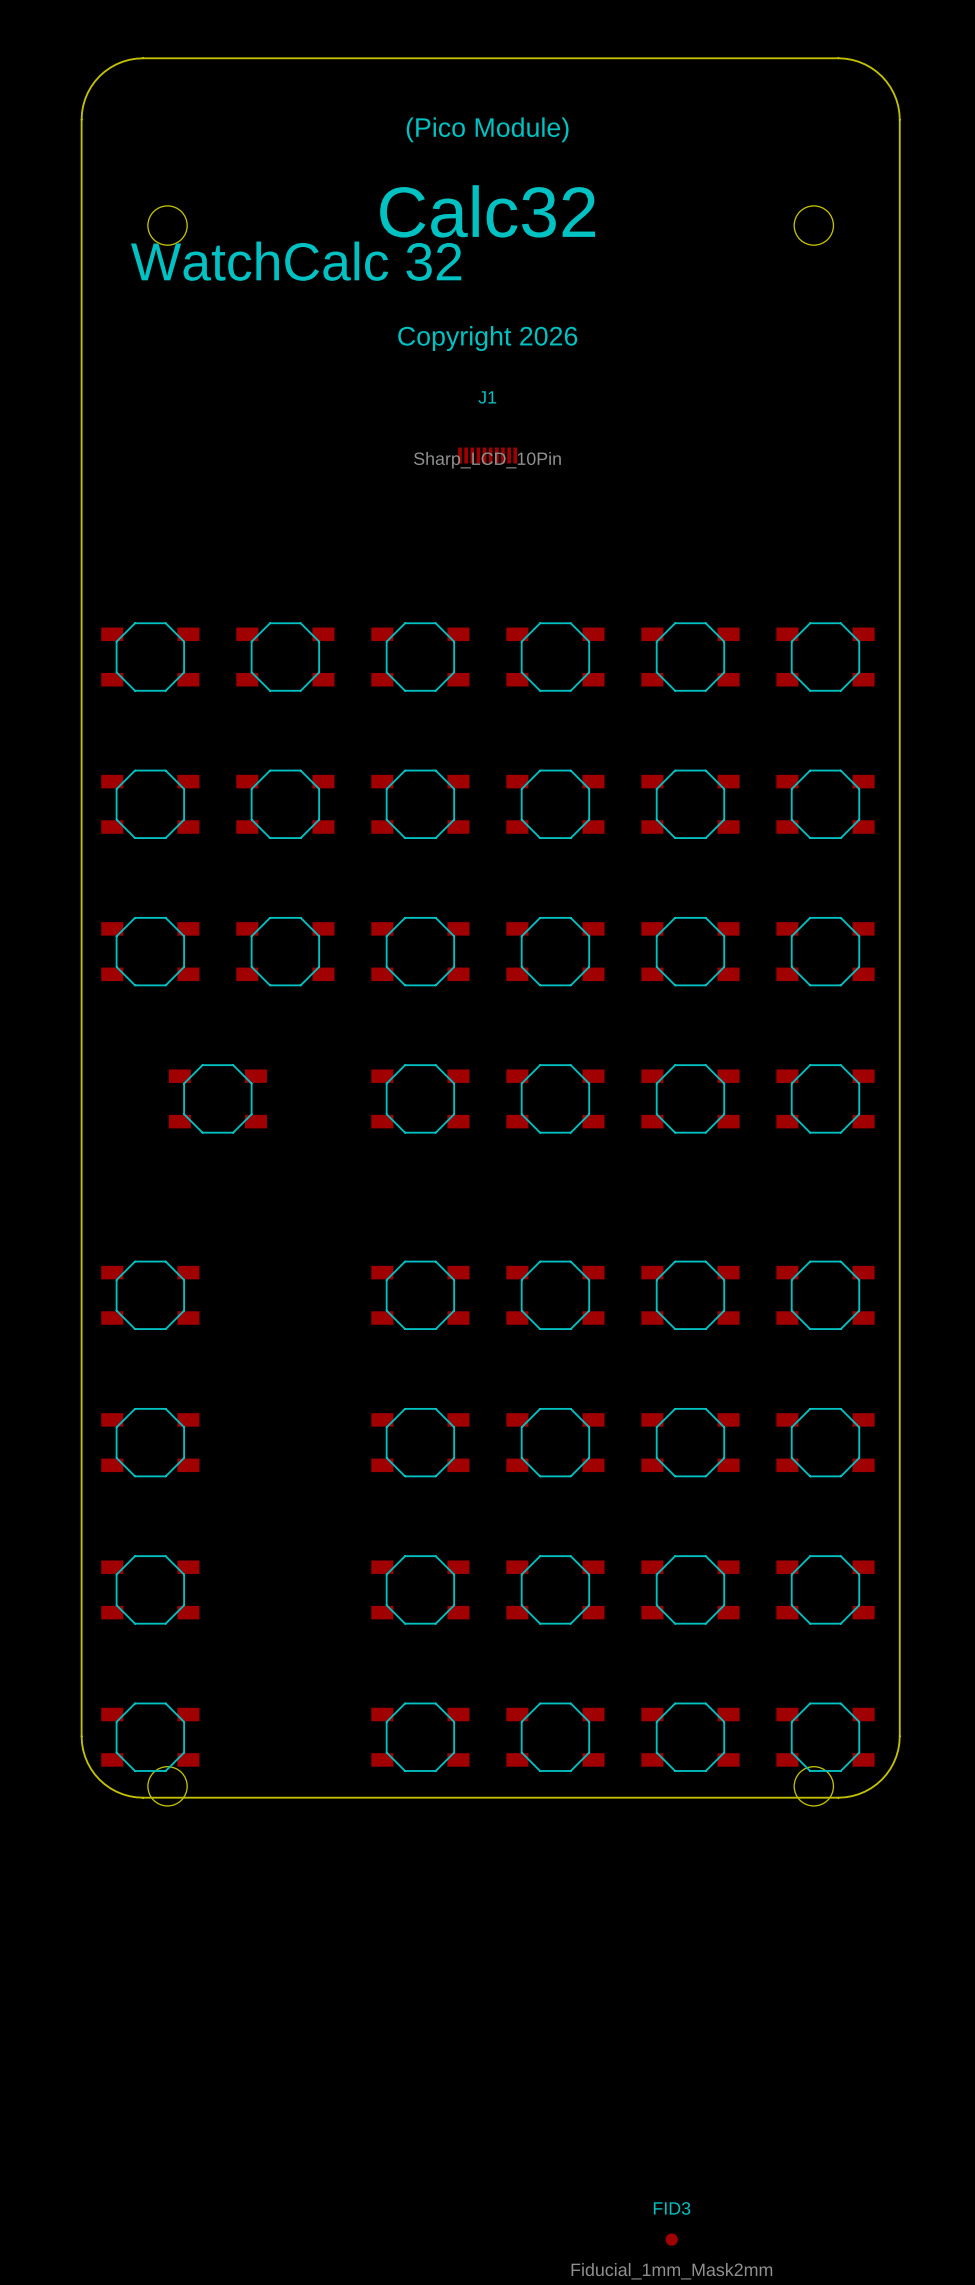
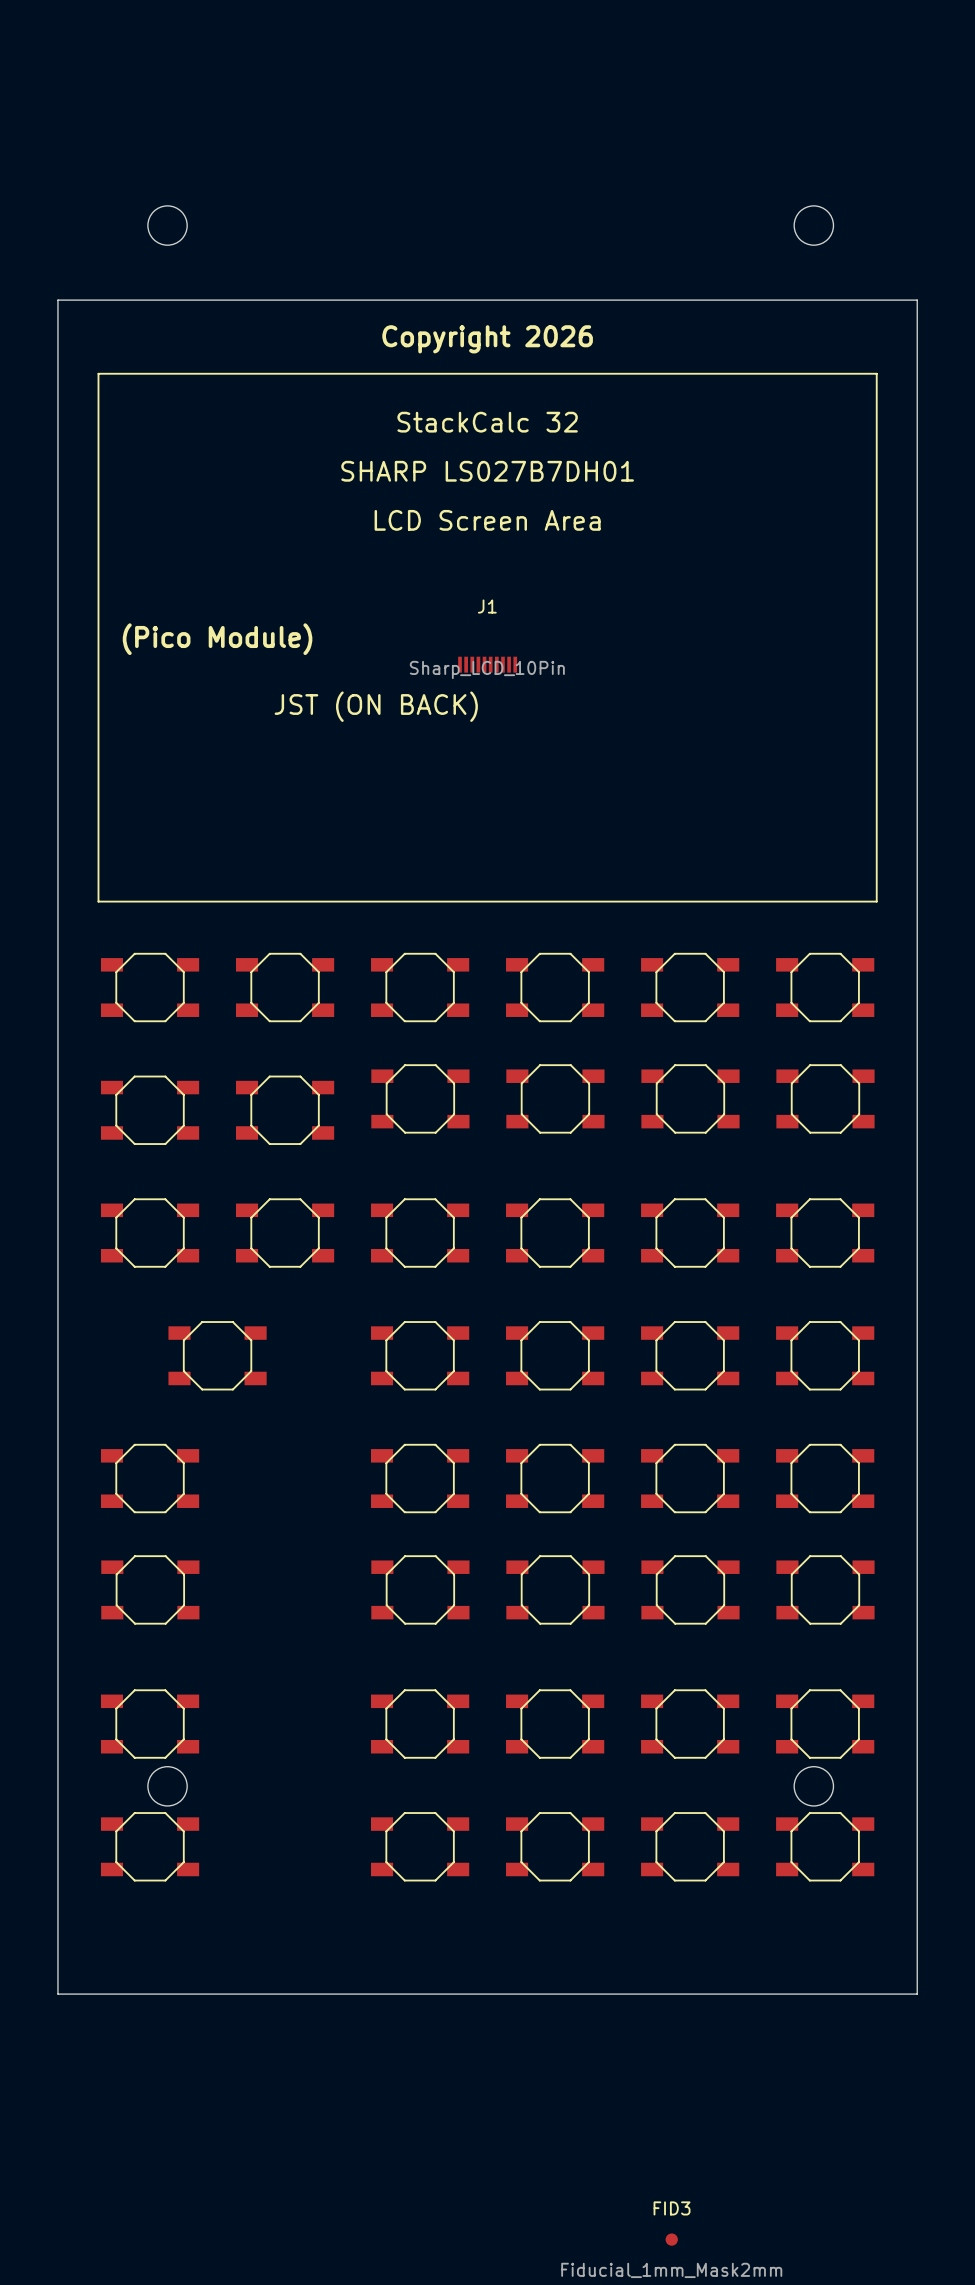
board edge: (142, 58) (838, 58) (852, 59) (871, 67) (886, 81) (893, 93) (898, 106) (899, 119) (899, 1736) (898, 1749) (890, 1768) (876, 1784) (865, 1791) (852, 1796) (838, 1797) (142, 1797) (129, 1796) (110, 1788) (95, 1774) (87, 1762) (83, 1749) (81, 1736) (81, 119) (85, 99) (91, 87) (99, 76) (110, 67) (122, 61) (142, 58) -> (57, 300) (57, 1994) (917, 1994) (917, 300) (57, 300)
text: (Pico Module) (487, 129) -> none
text: Calc32 (487, 211) -> none
text: WatchCalc 32 (296, 261) -> none
line: none -> (98, 373) (98, 901) (876, 901) (876, 373) (98, 373)
text: none -> StackCalc 32 (487, 422)
J1 position: (487, 455) -> (487, 664)
text: none -> SHARP LS027B7DH01 (487, 471)
text: none -> LCD Screen Area (487, 520)
text: none -> (Pico Module) (217, 639)
part: (150, 657) -> none
part: (285, 657) -> none
part: (420, 657) -> none
part: (555, 657) -> none
part: (690, 657) -> none
part: (825, 657) -> none
text: none -> JST (ON BACK) (376, 706)
part: (150, 804) -> none
part: (285, 804) -> none
part: (420, 804) -> none
part: (555, 804) -> none
part: (690, 804) -> none
part: (825, 804) -> none
part position: (150, 951) -> (150, 987)
part position: (285, 951) -> (285, 987)
part position: (420, 951) -> (420, 987)
part position: (555, 951) -> (555, 987)
part position: (690, 951) -> (690, 987)
part position: (825, 951) -> (825, 987)
part: (217, 1098) -> none
part: none -> (150, 1110)
part: none -> (285, 1110)
part: none -> (150, 1233)
part: none -> (285, 1233)
part: none -> (420, 1233)
part: none -> (555, 1233)
part: none -> (690, 1233)
part: none -> (825, 1233)
part: (150, 1295) -> none
part: (420, 1295) -> none
part: (555, 1295) -> none
part: (690, 1295) -> none
part: (825, 1295) -> none
part: none -> (217, 1355)
part: none -> (420, 1355)
part: none -> (555, 1355)
part: none -> (690, 1355)
part: none -> (825, 1355)
part position: (150, 1442) -> (150, 1478)
part position: (420, 1442) -> (420, 1478)
part position: (555, 1442) -> (555, 1478)
part position: (690, 1442) -> (690, 1478)
part position: (825, 1442) -> (825, 1478)
part position: (150, 1737) -> (150, 1724)
part position: (420, 1737) -> (420, 1724)
part position: (555, 1737) -> (555, 1724)
part position: (690, 1737) -> (690, 1724)
part position: (825, 1737) -> (825, 1724)
part: none -> (150, 1846)
part: none -> (420, 1846)
part: none -> (555, 1846)
part: none -> (690, 1846)
part: none -> (825, 1846)

